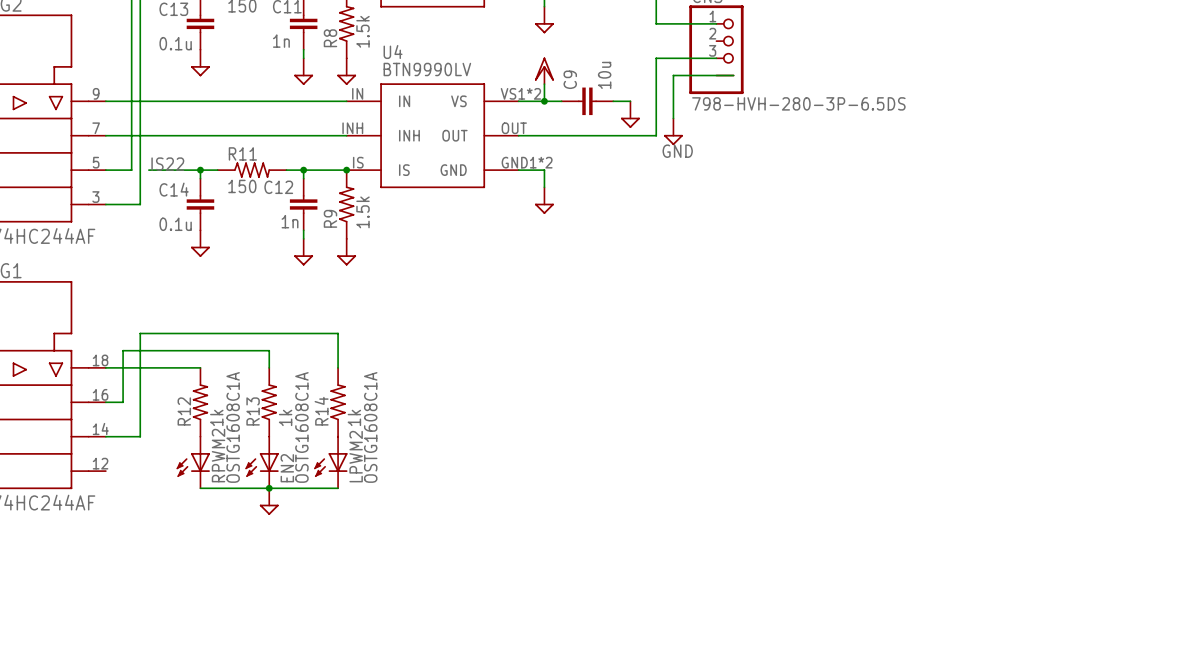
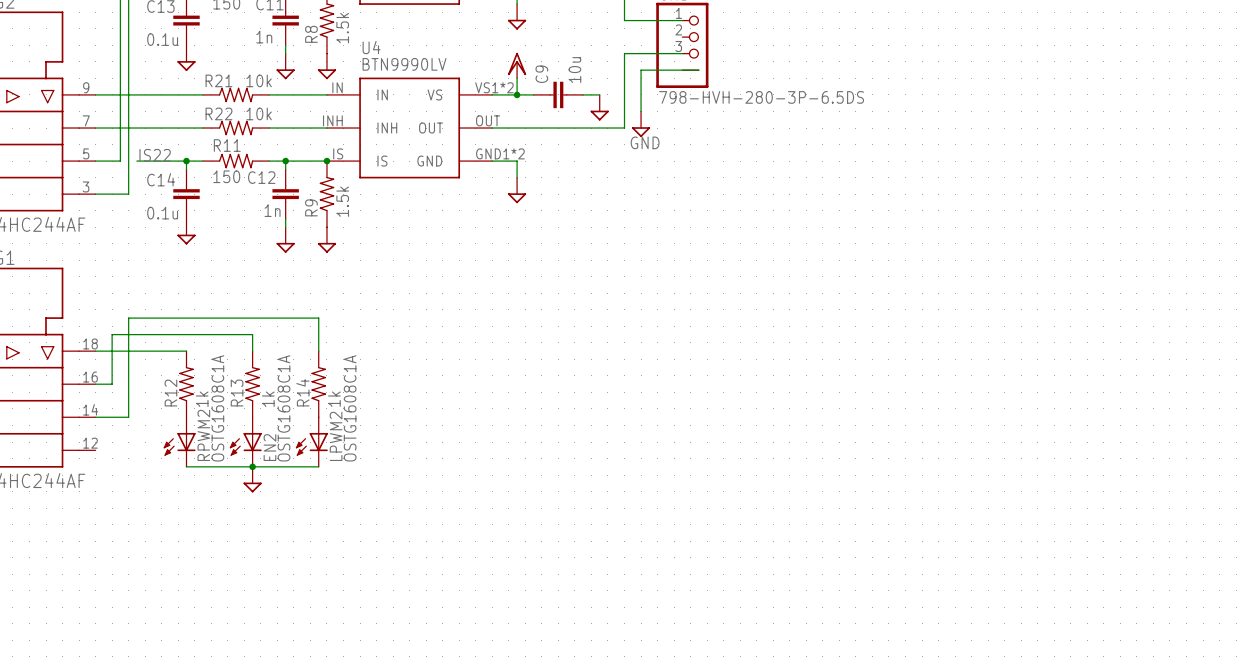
R21: none -> 10k (236, 94)
R22: none -> 10k (236, 128)

